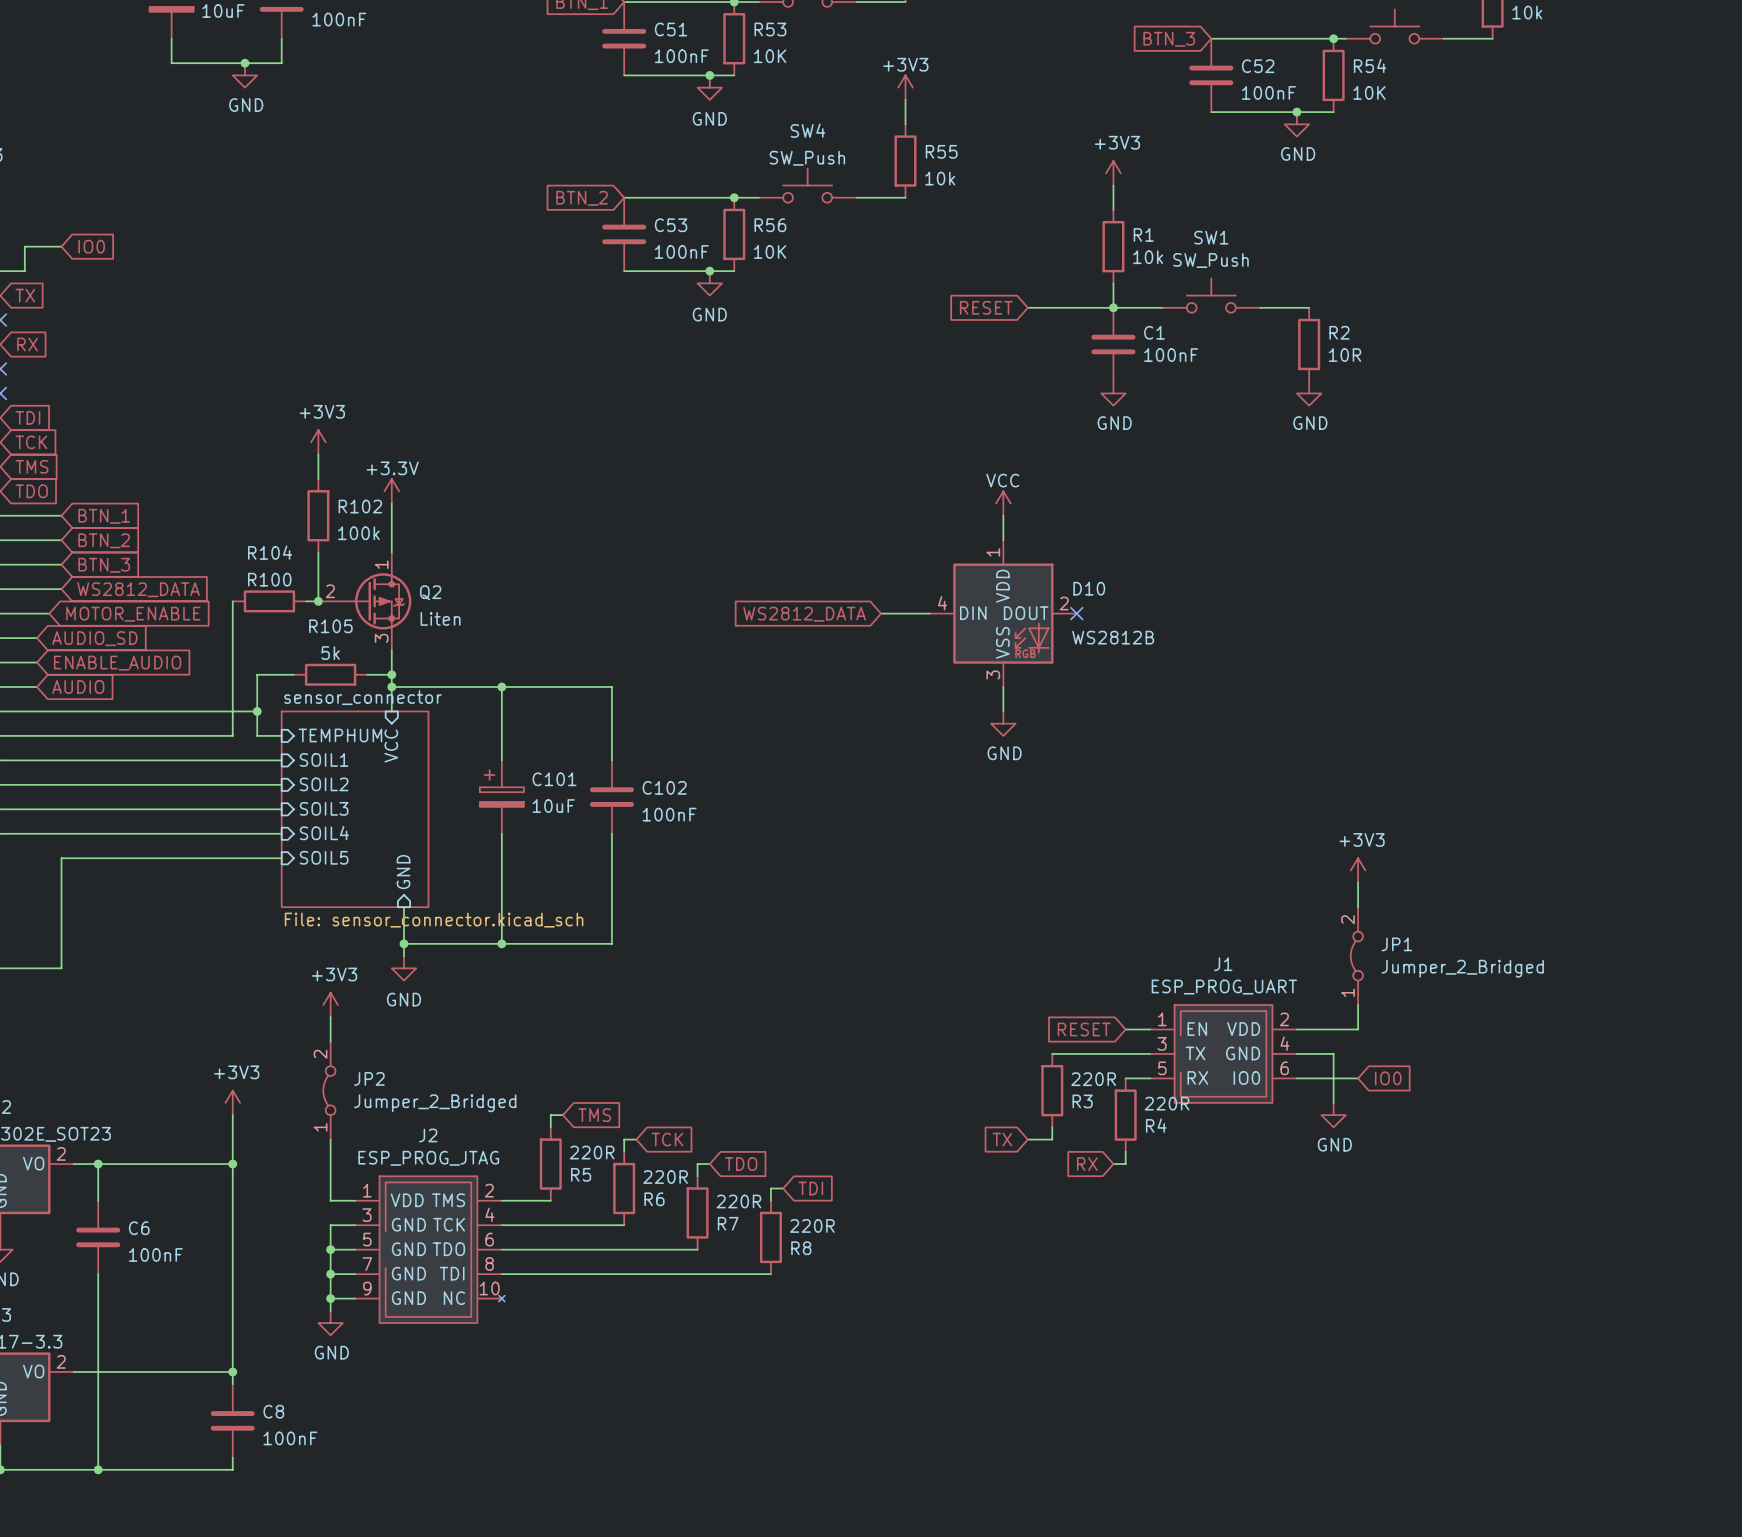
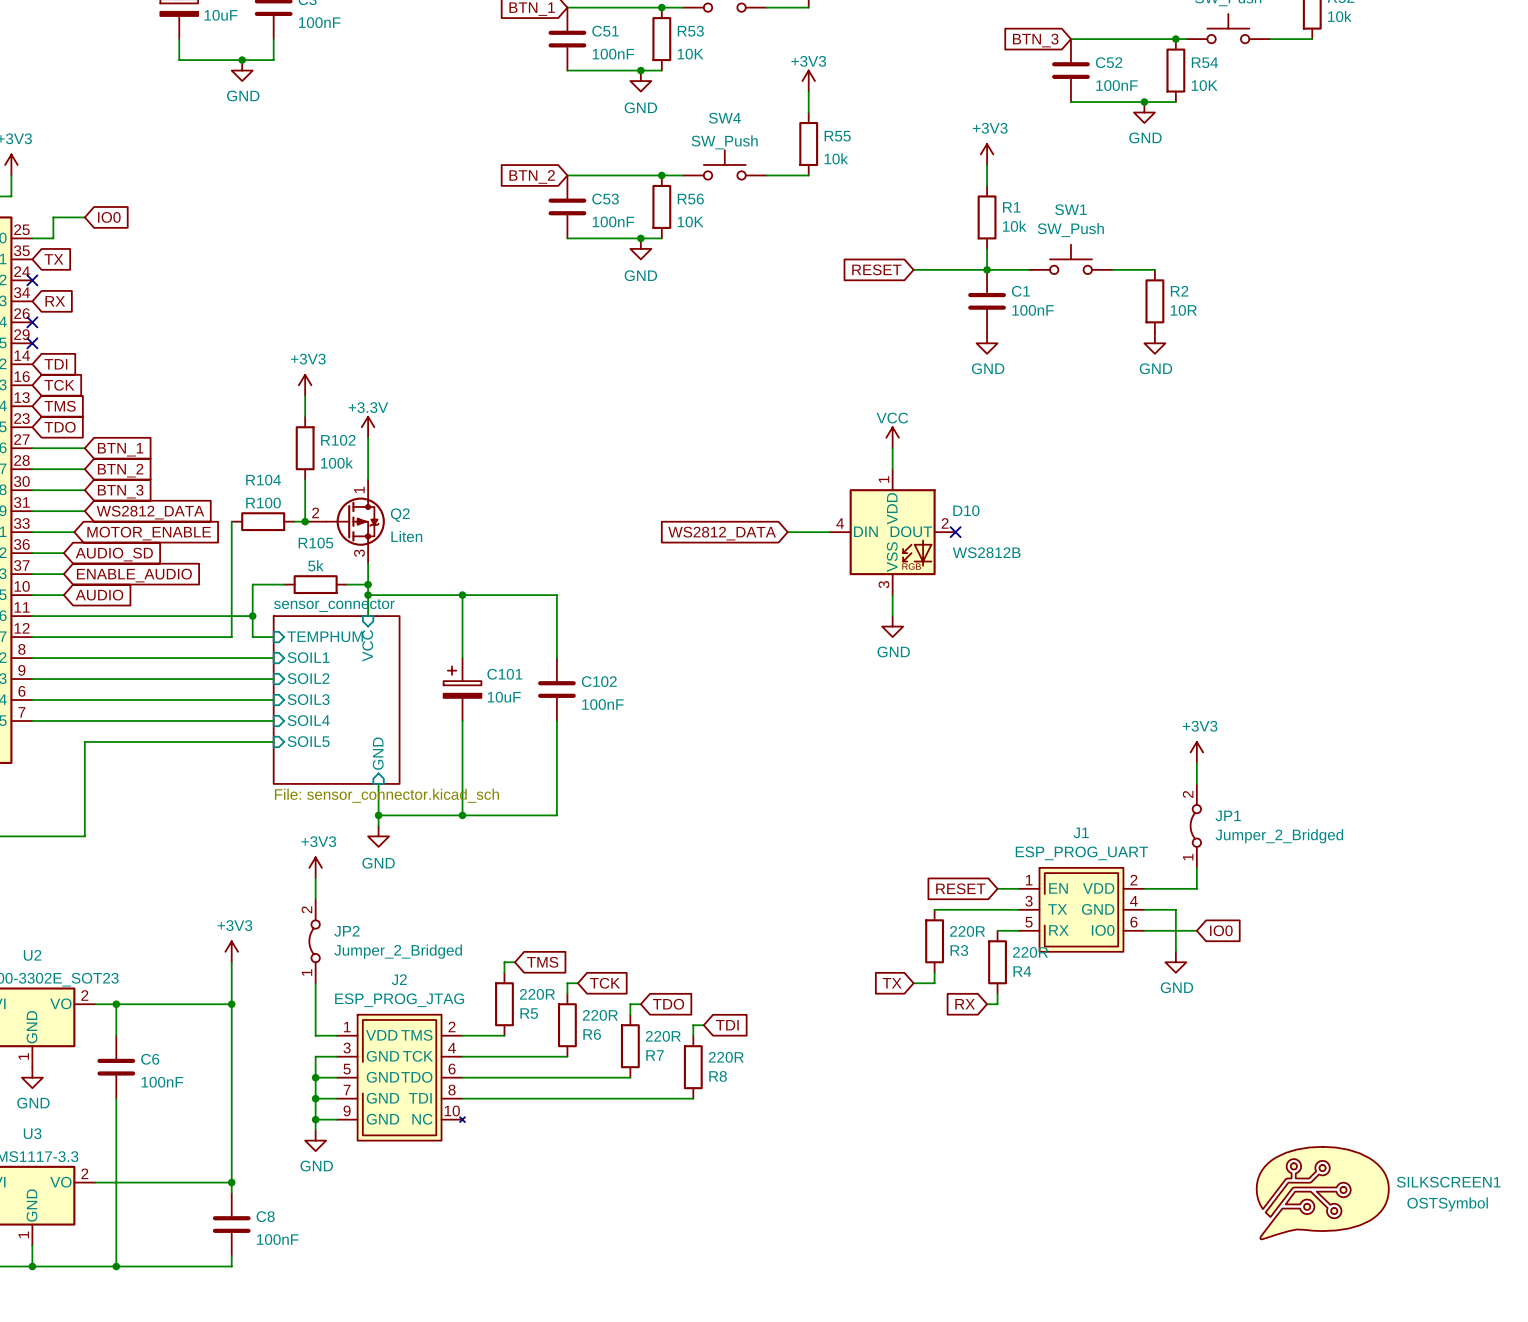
SILKSCREEN1: none -> OSTSymbol (1322, 1193)

